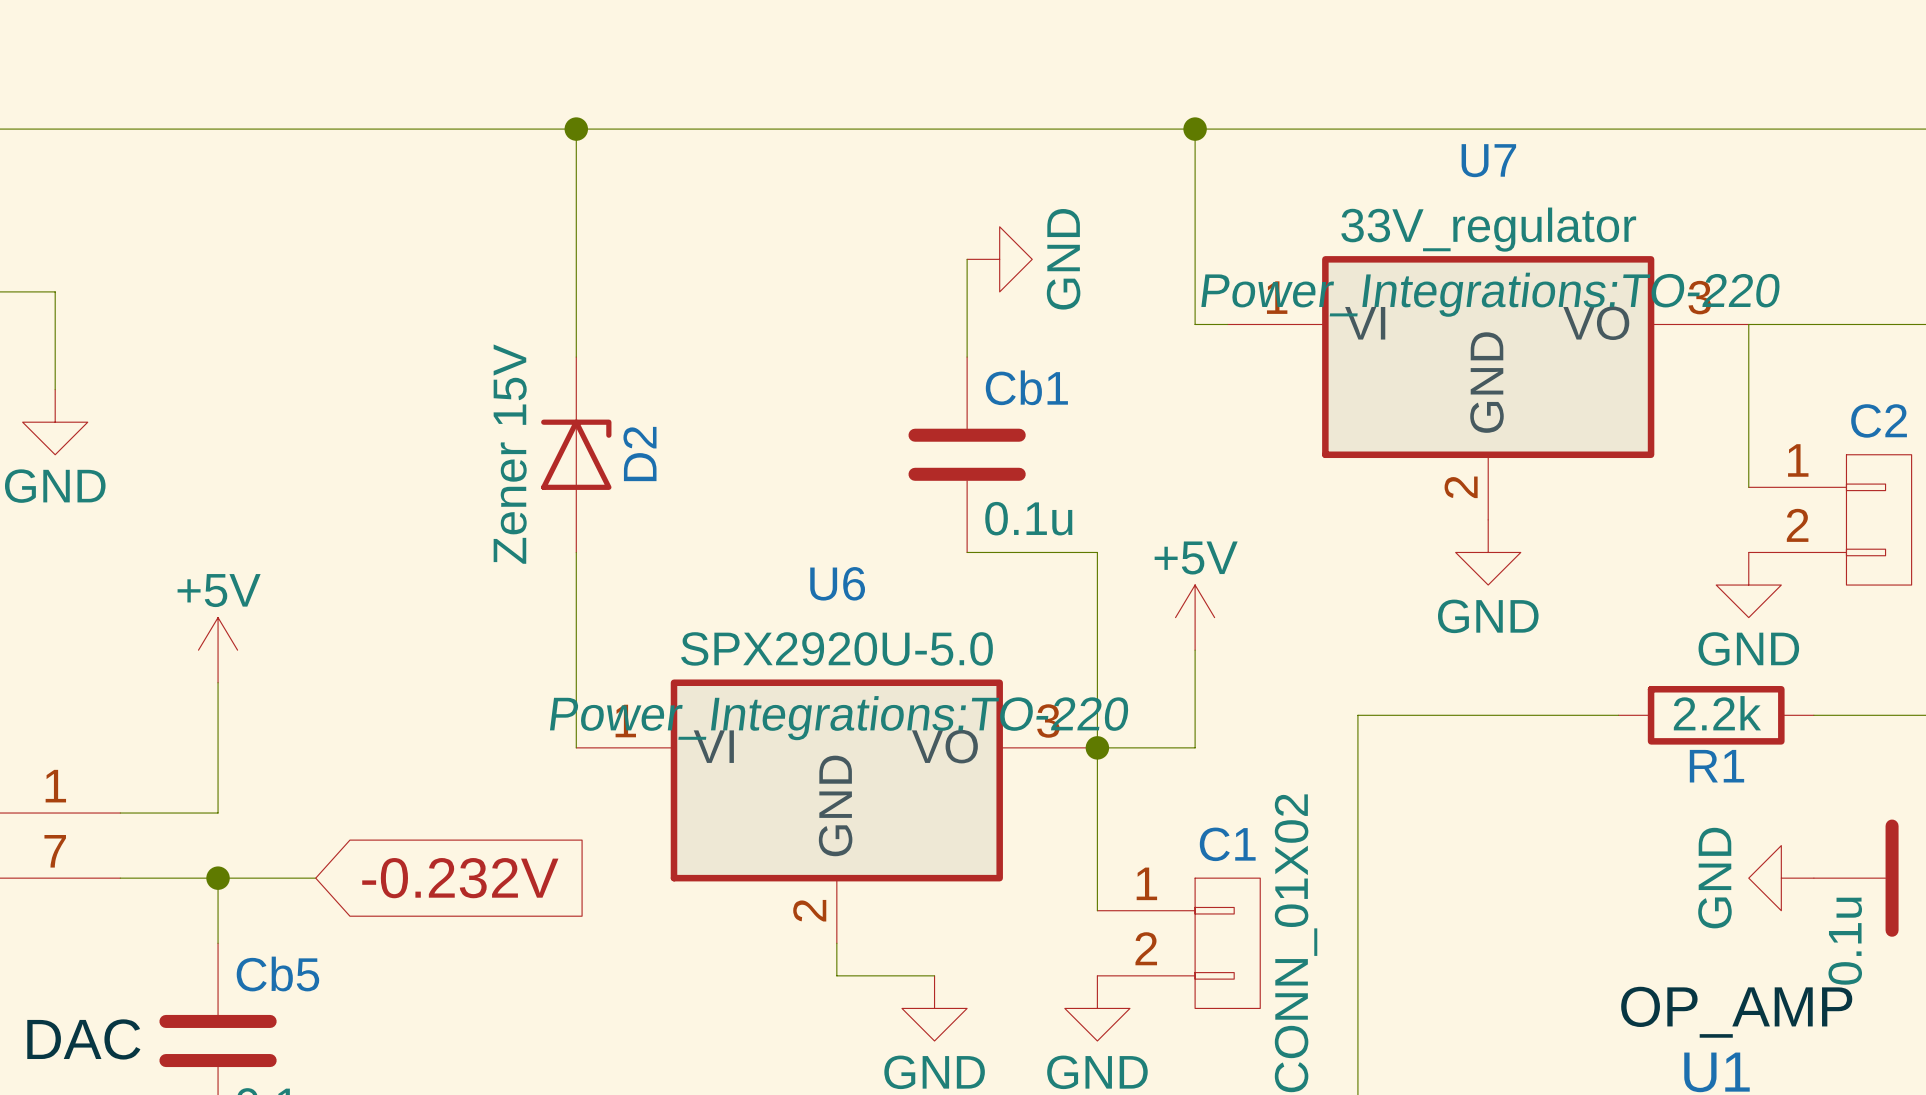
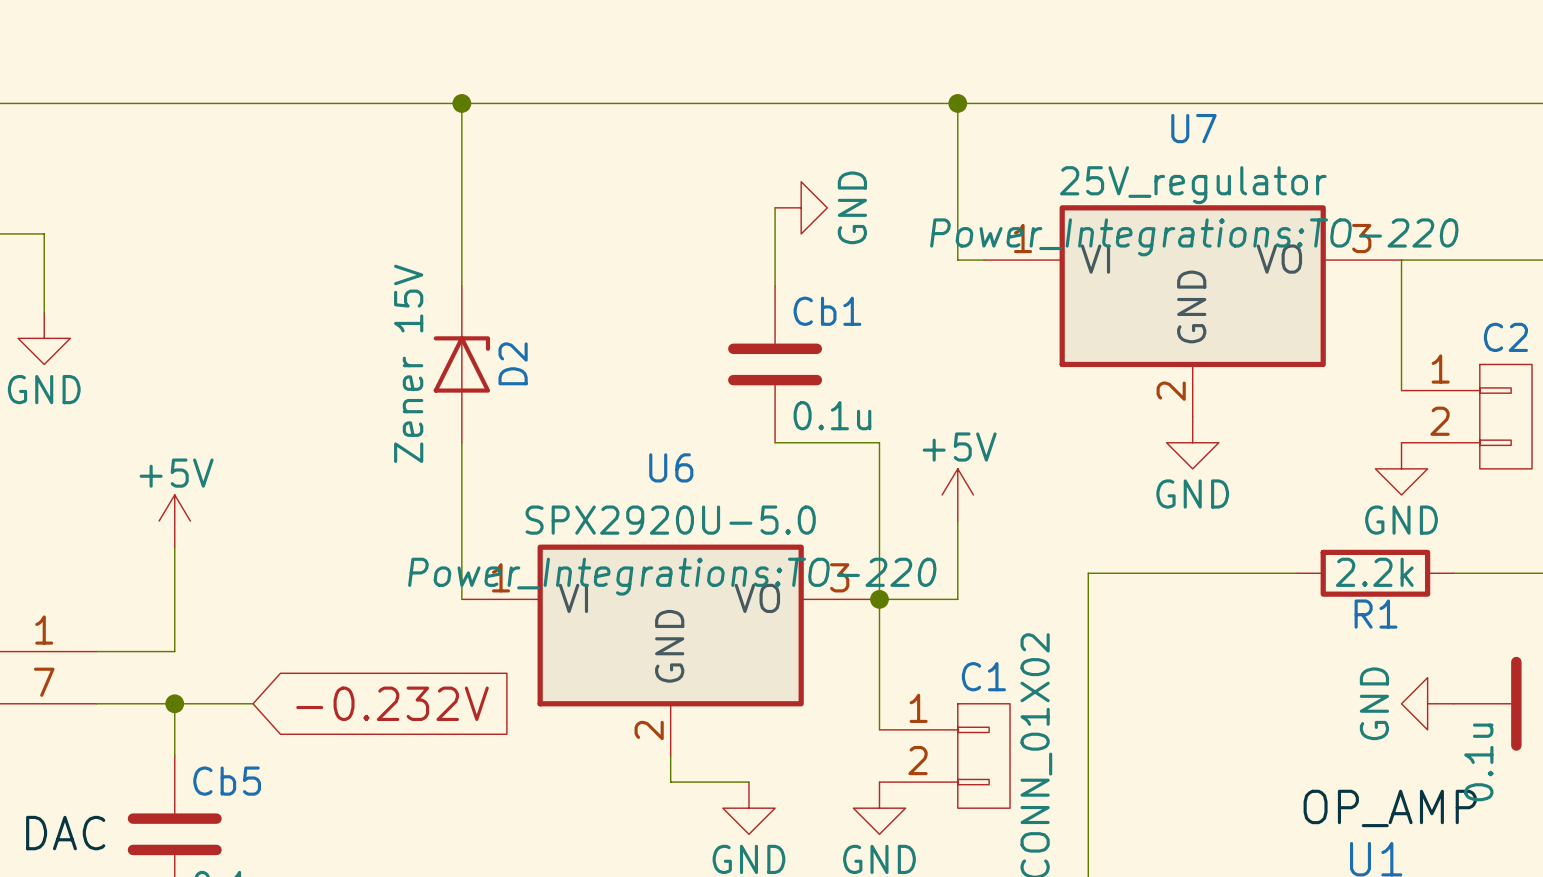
U7 value: 33V_regulator (1488, 229) -> 25V_regulator (1193, 185)

